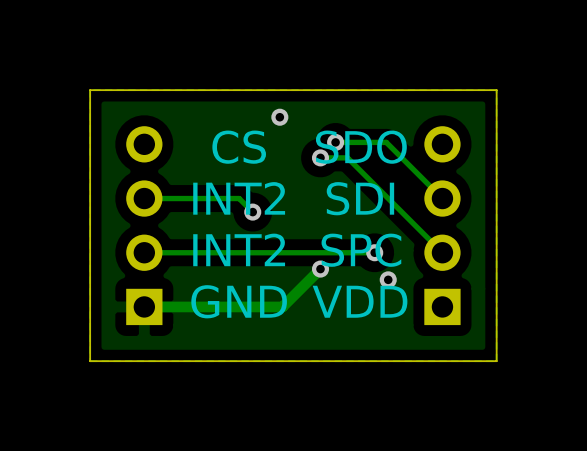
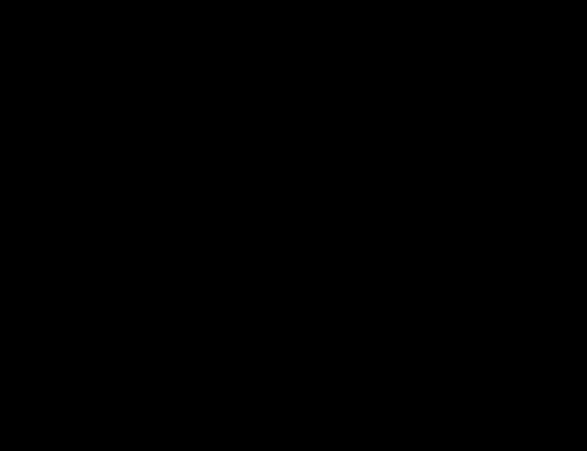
board edge: (496, 90) (90, 90) (90, 361) (496, 361) (496, 90) -> none
via: (279, 117) -> none
track: (335, 142) (386, 142) (442, 198) -> none
via: (335, 142) -> none
text: CS (239, 147) -> none
text: SDO (361, 147) -> none
track: (320, 157) (347, 157) (442, 252) -> none
via: (320, 157) -> none
track: (144, 198) (239, 198) (252, 212) -> none
text: INT2 (239, 198) -> none
text: SDI (360, 198) -> none
via: (252, 212) -> none
part: (144, 225) -> none
part: (442, 225) -> none
text: INT2 (239, 249) -> none
text: SPC (361, 250) -> none
track: (374, 252) (144, 252) -> none
via: (374, 252) -> none
track: (320, 269) (282, 306) (144, 306) -> none
via: (320, 269) -> none
via: (388, 279) -> none
text: GND (239, 301) -> none
text: VDD (360, 301) -> none

